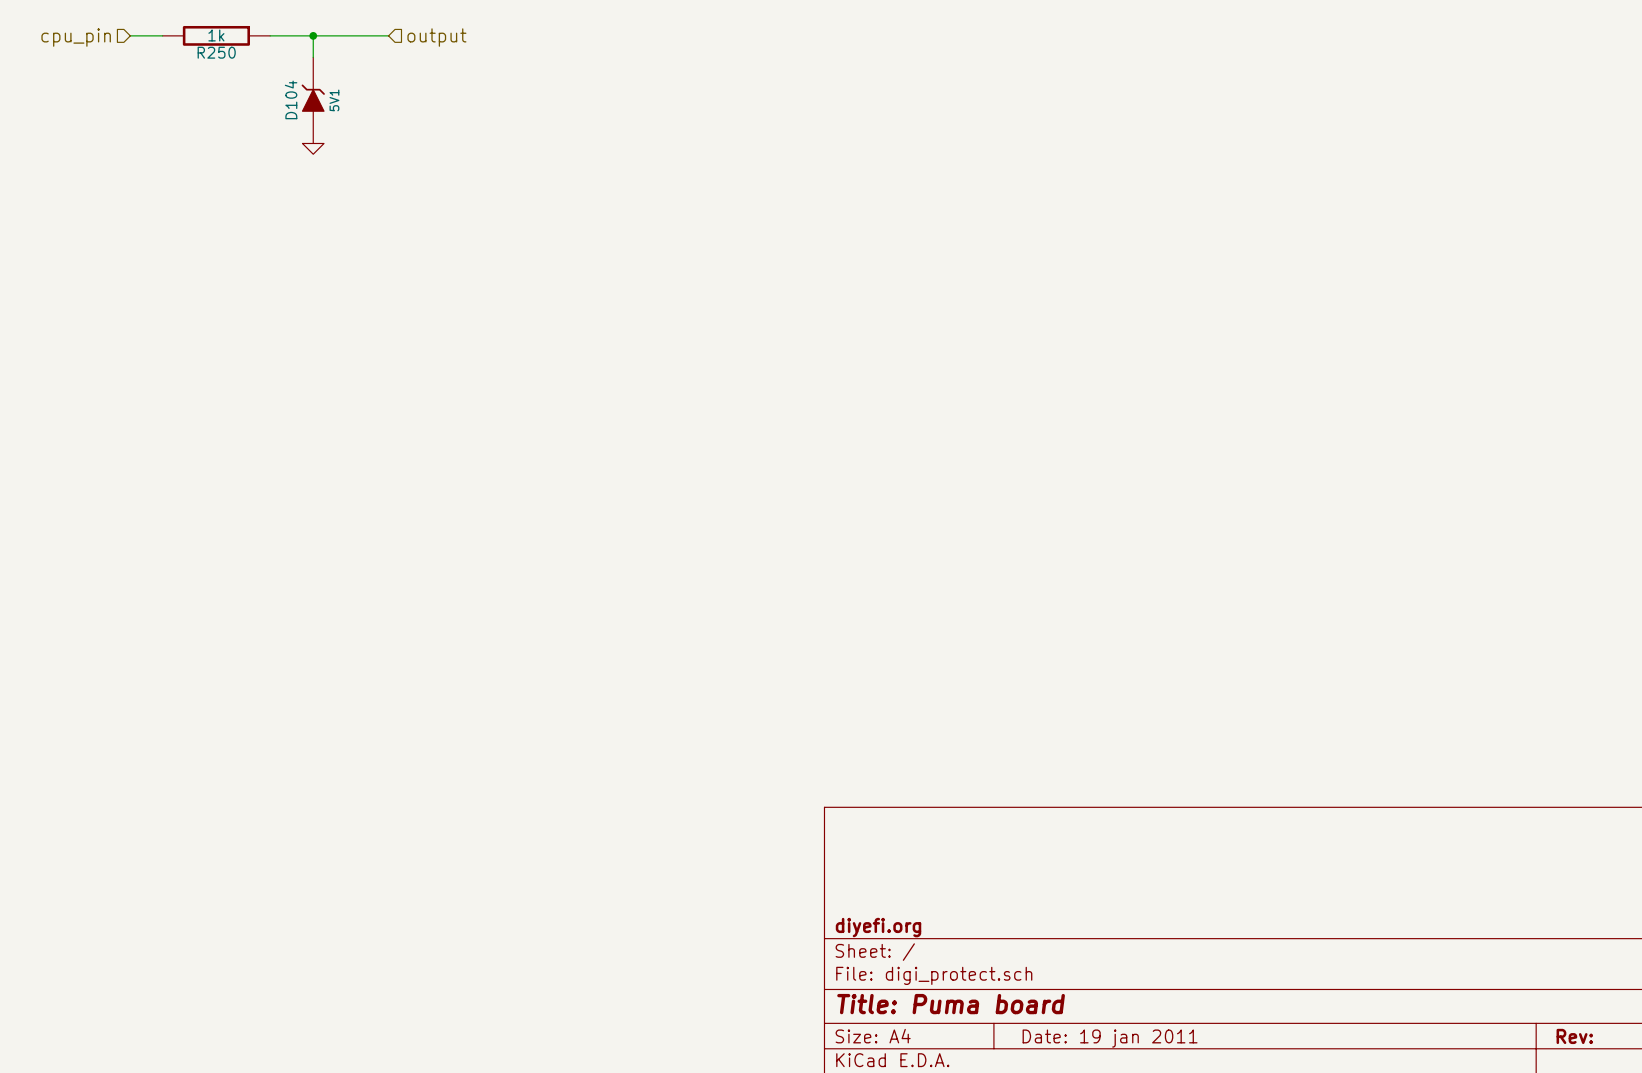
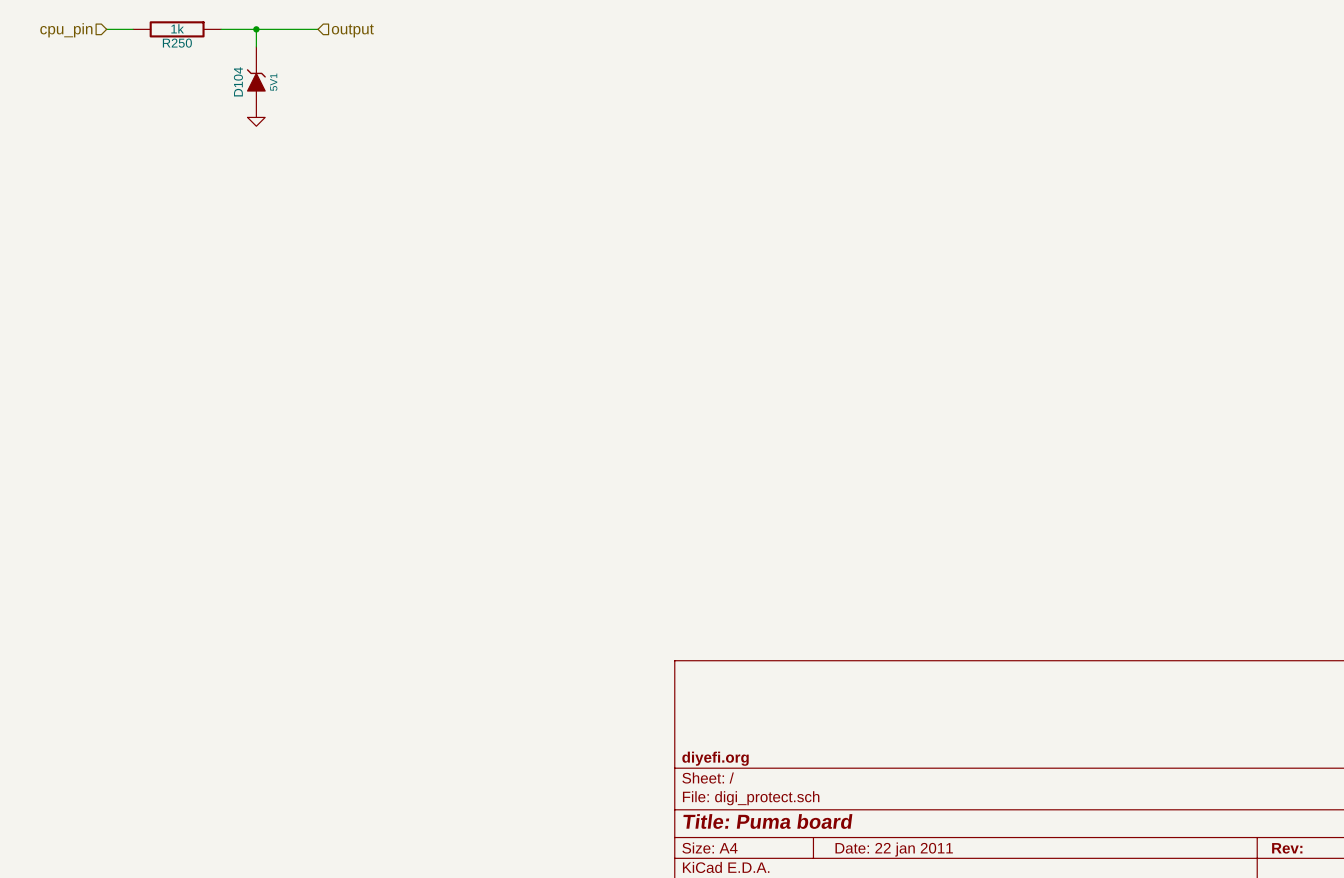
title block: Date: 19 jan 2011 (1110, 1038) -> Date: 22 jan 2011 (894, 849)

